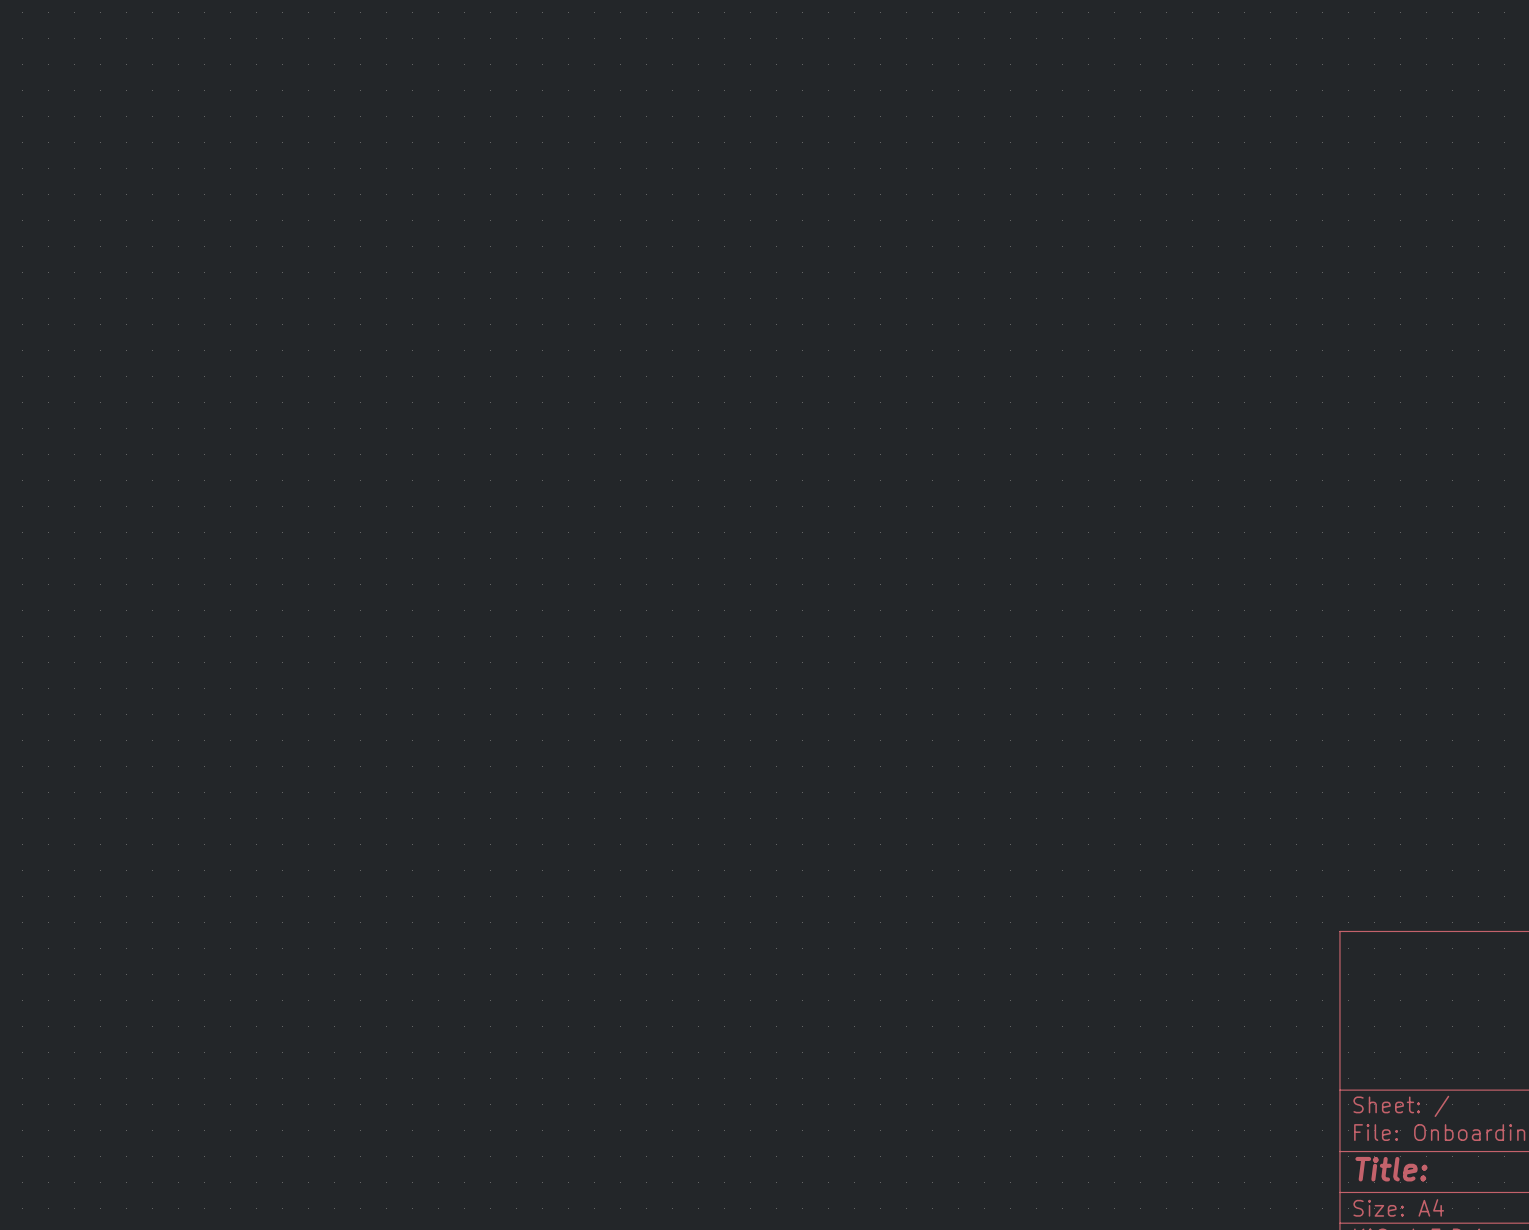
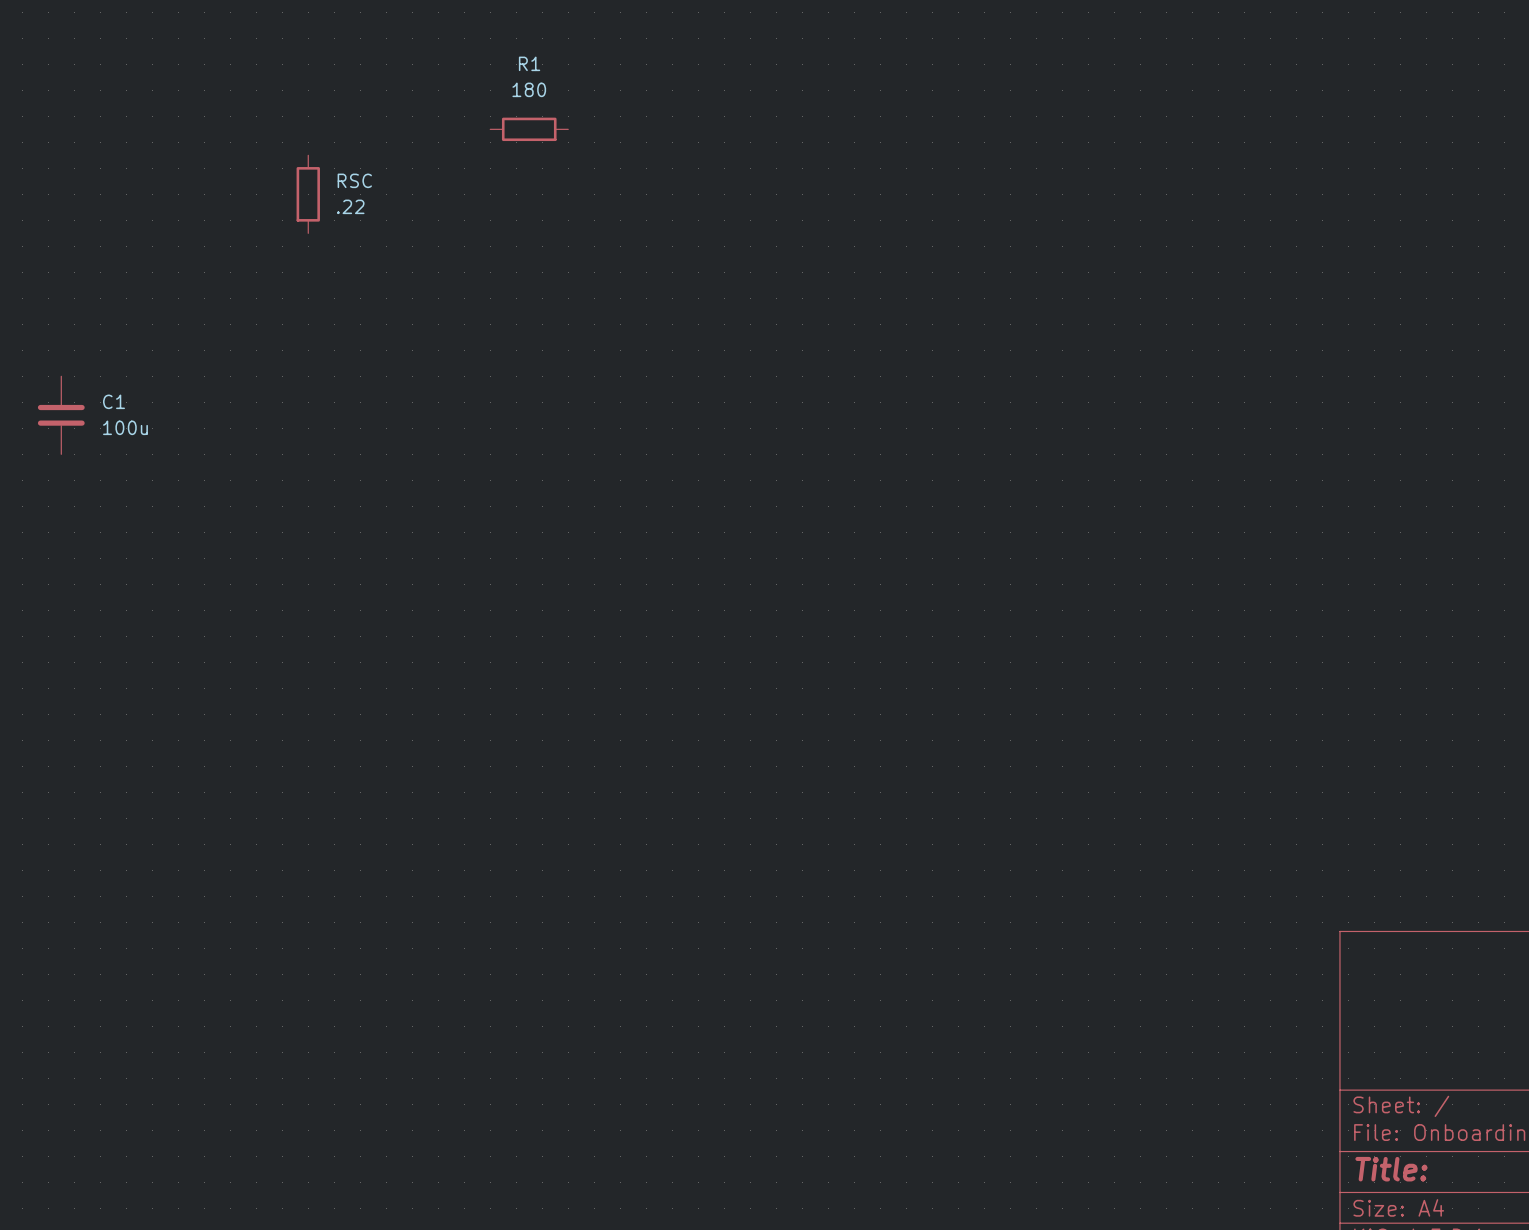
R1: none -> 180 (529, 129)
RSC: none -> .22 (308, 194)
C1: none -> 100u (61, 415)

